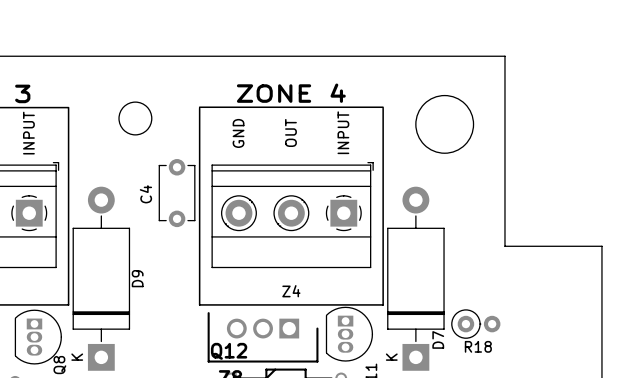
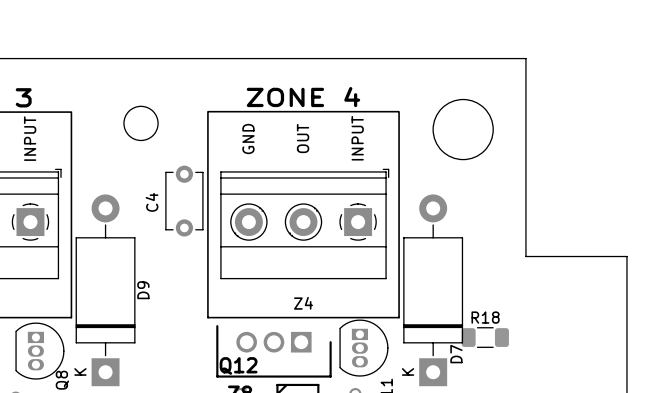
R18 footprint: [451, 309, 501, 339] -> [461, 327, 509, 348]
R18 name position: R18 (478, 346) -> R18 (485, 317)

